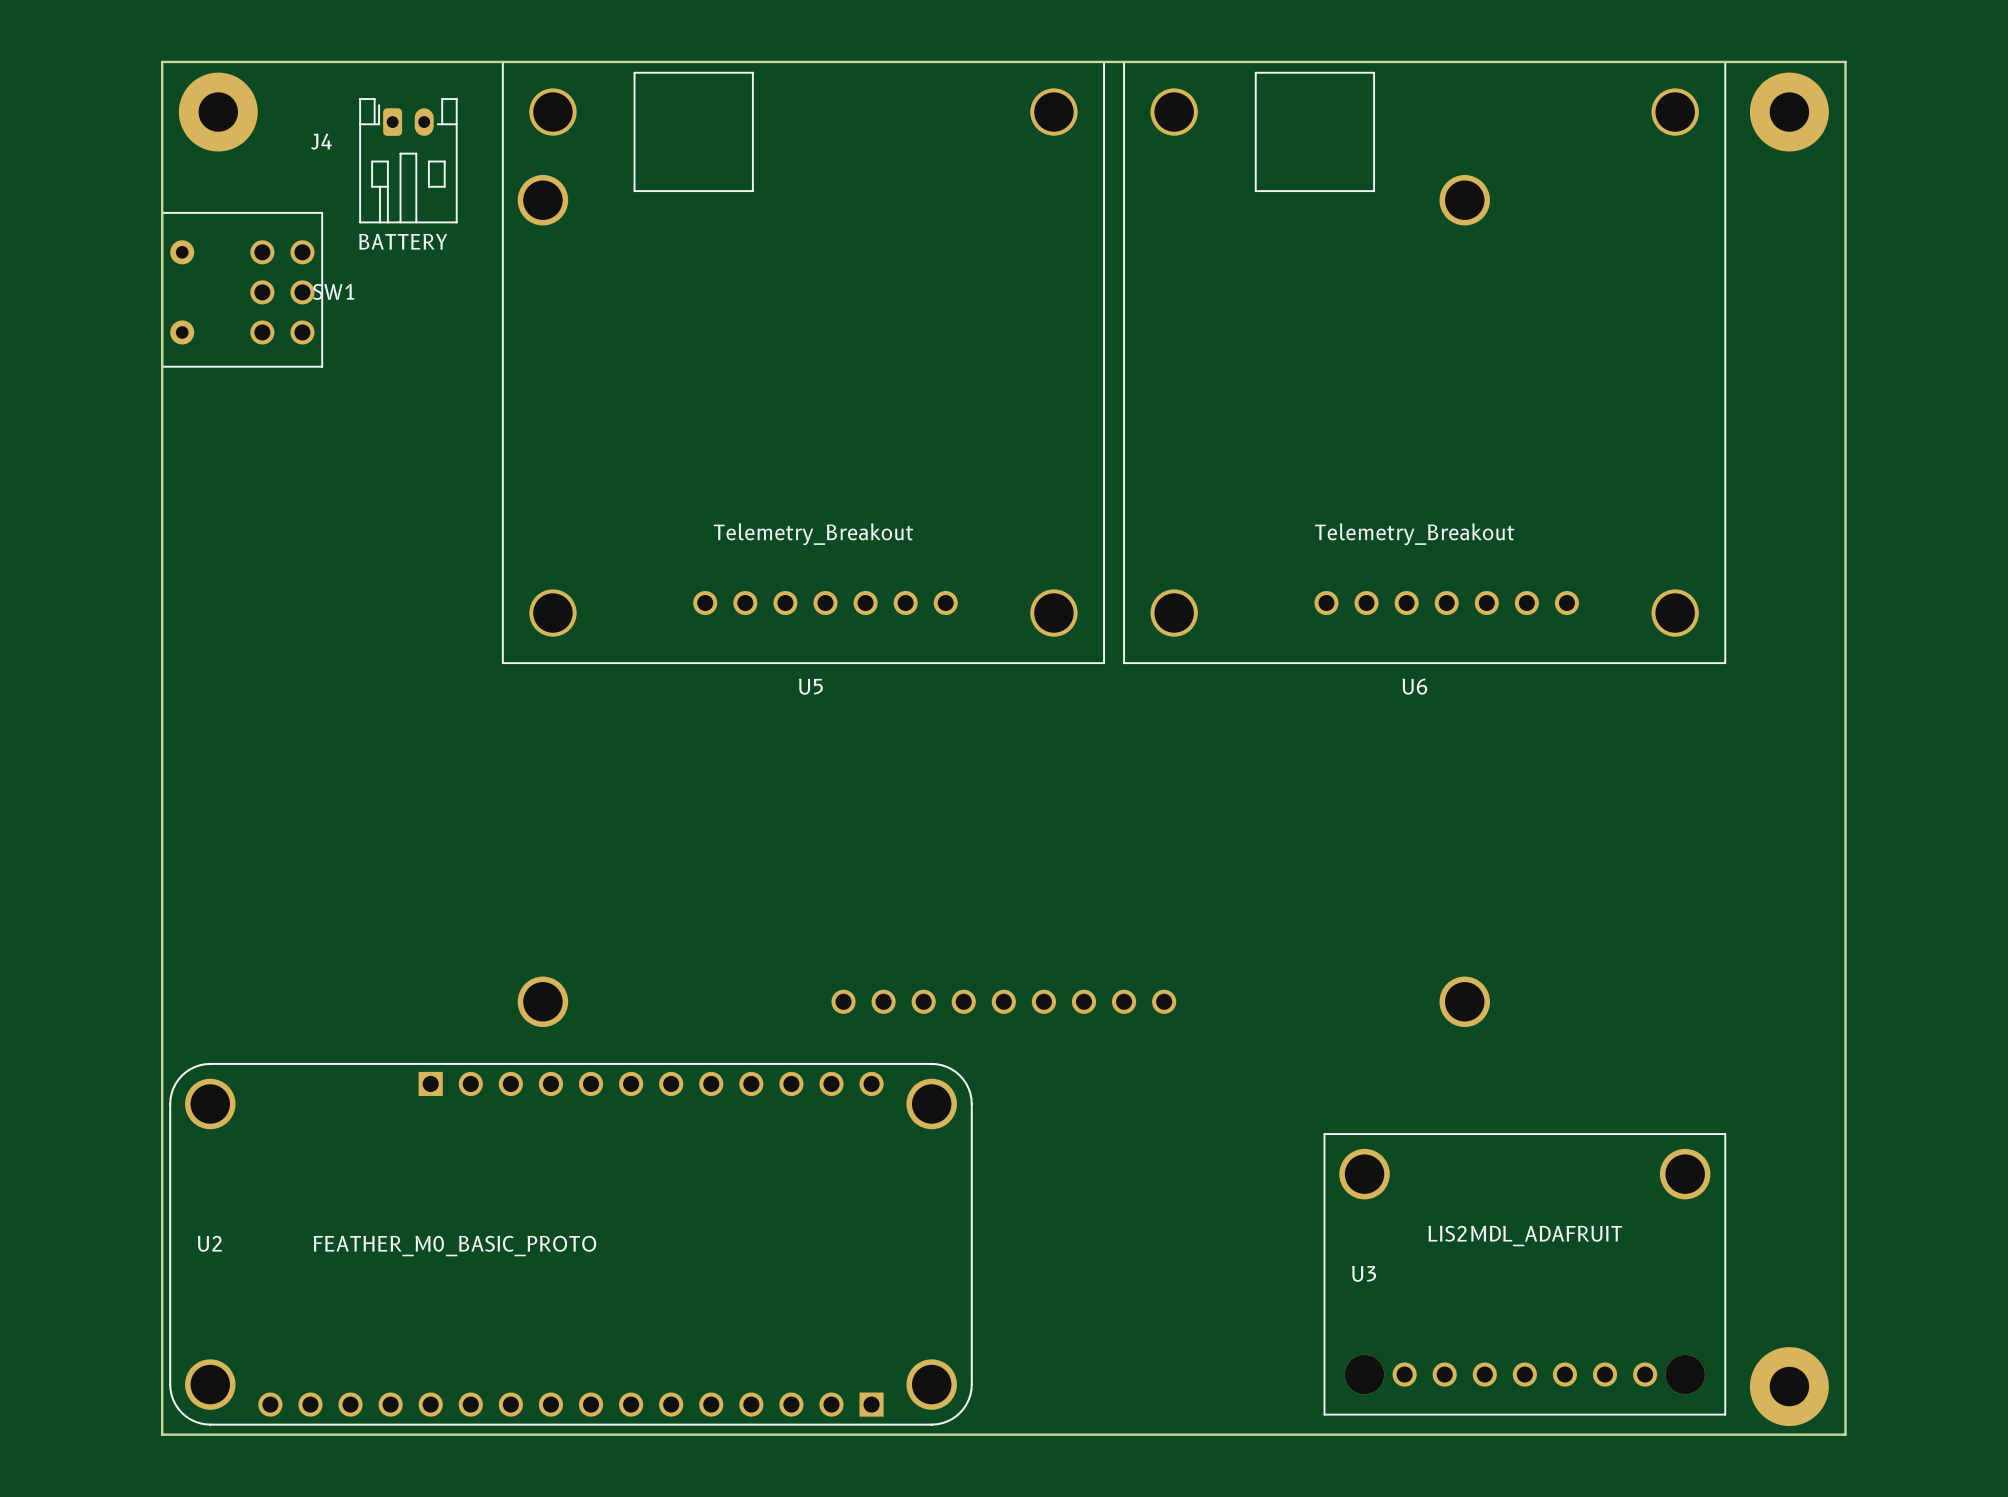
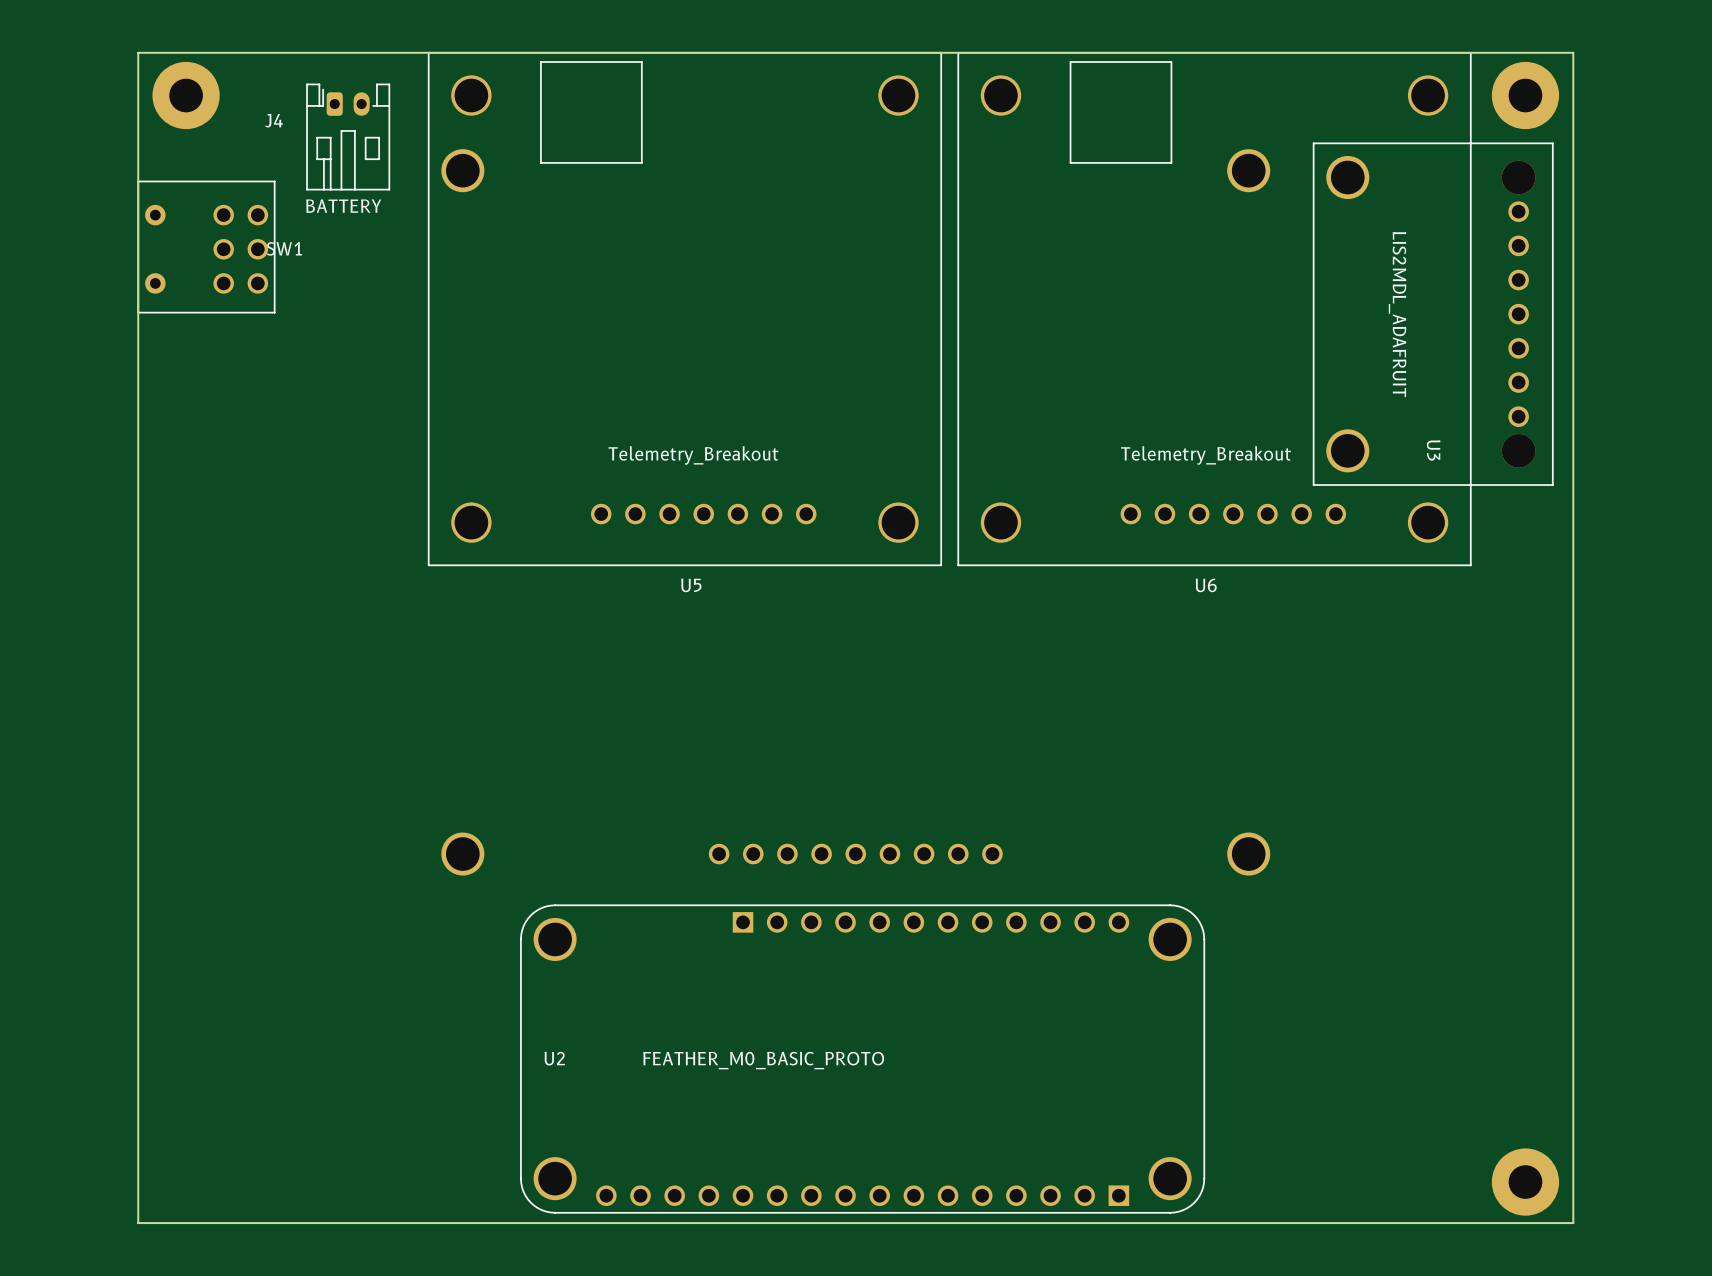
U2 position: (570, 1244) -> (862, 1059)
U3 rotation: 0° (1524, 1274) -> 90° counterclockwise (1433, 314)
U3 position: (1524, 1274) -> (1433, 314)

